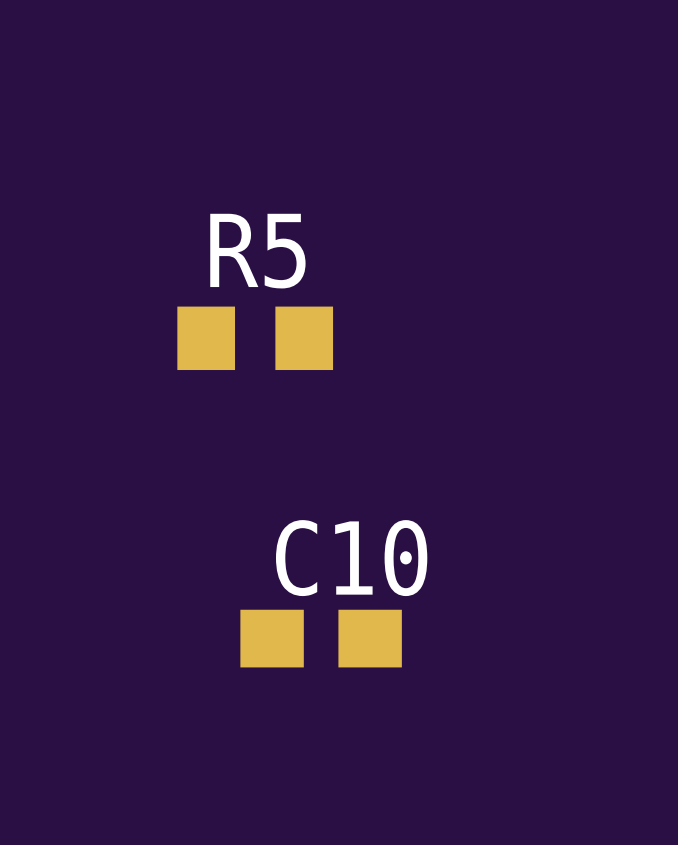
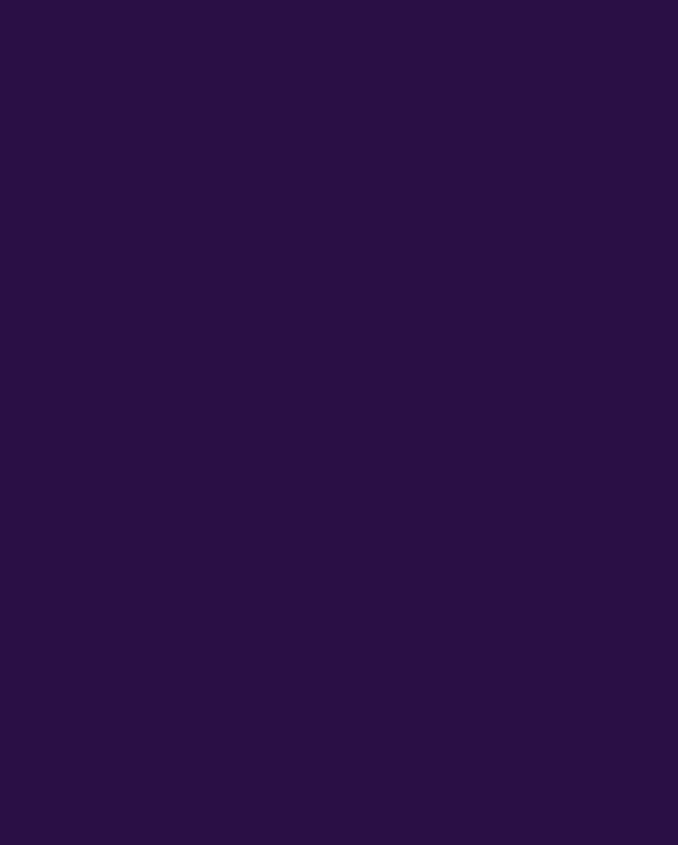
R5: (255, 338) -> none
C10: (321, 638) -> none

